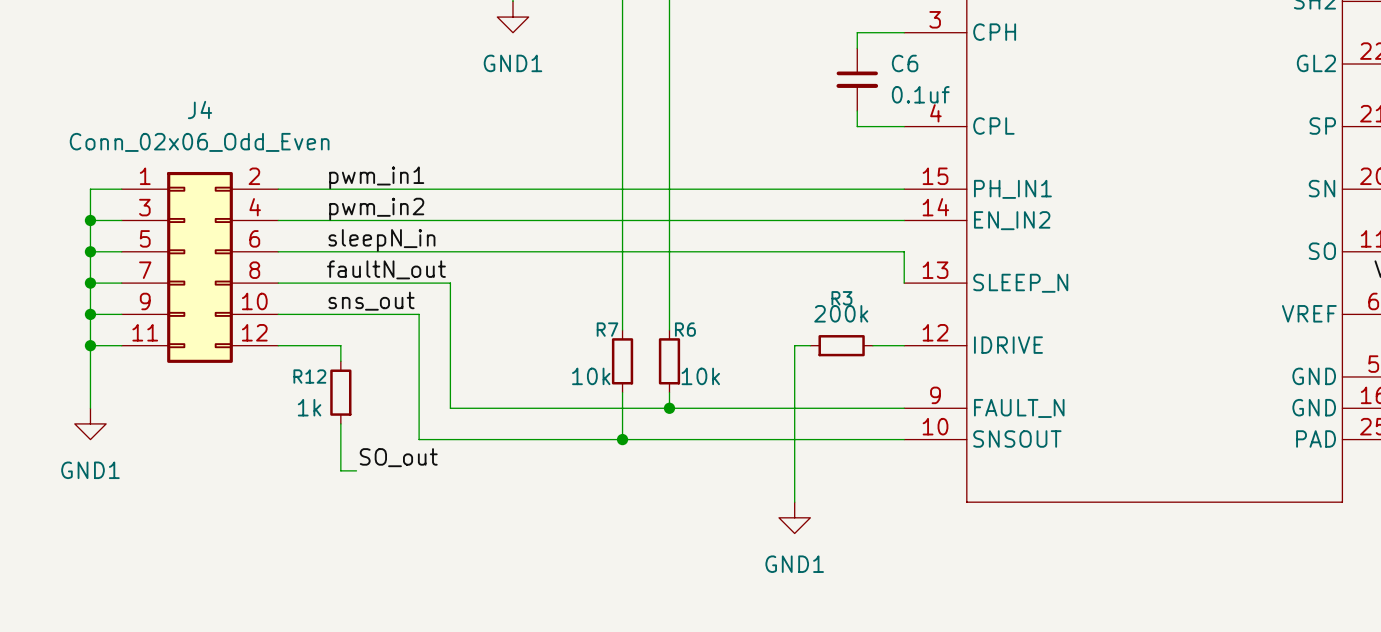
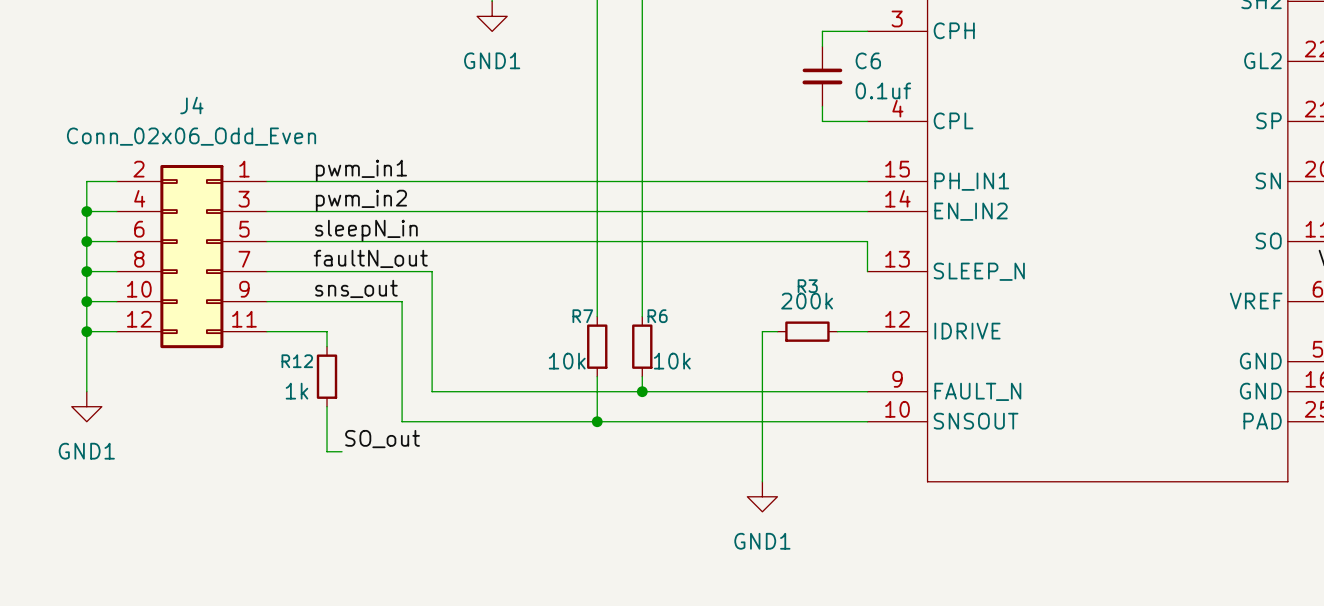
J4 flip: as is (200, 267) -> left-right (191, 256)

